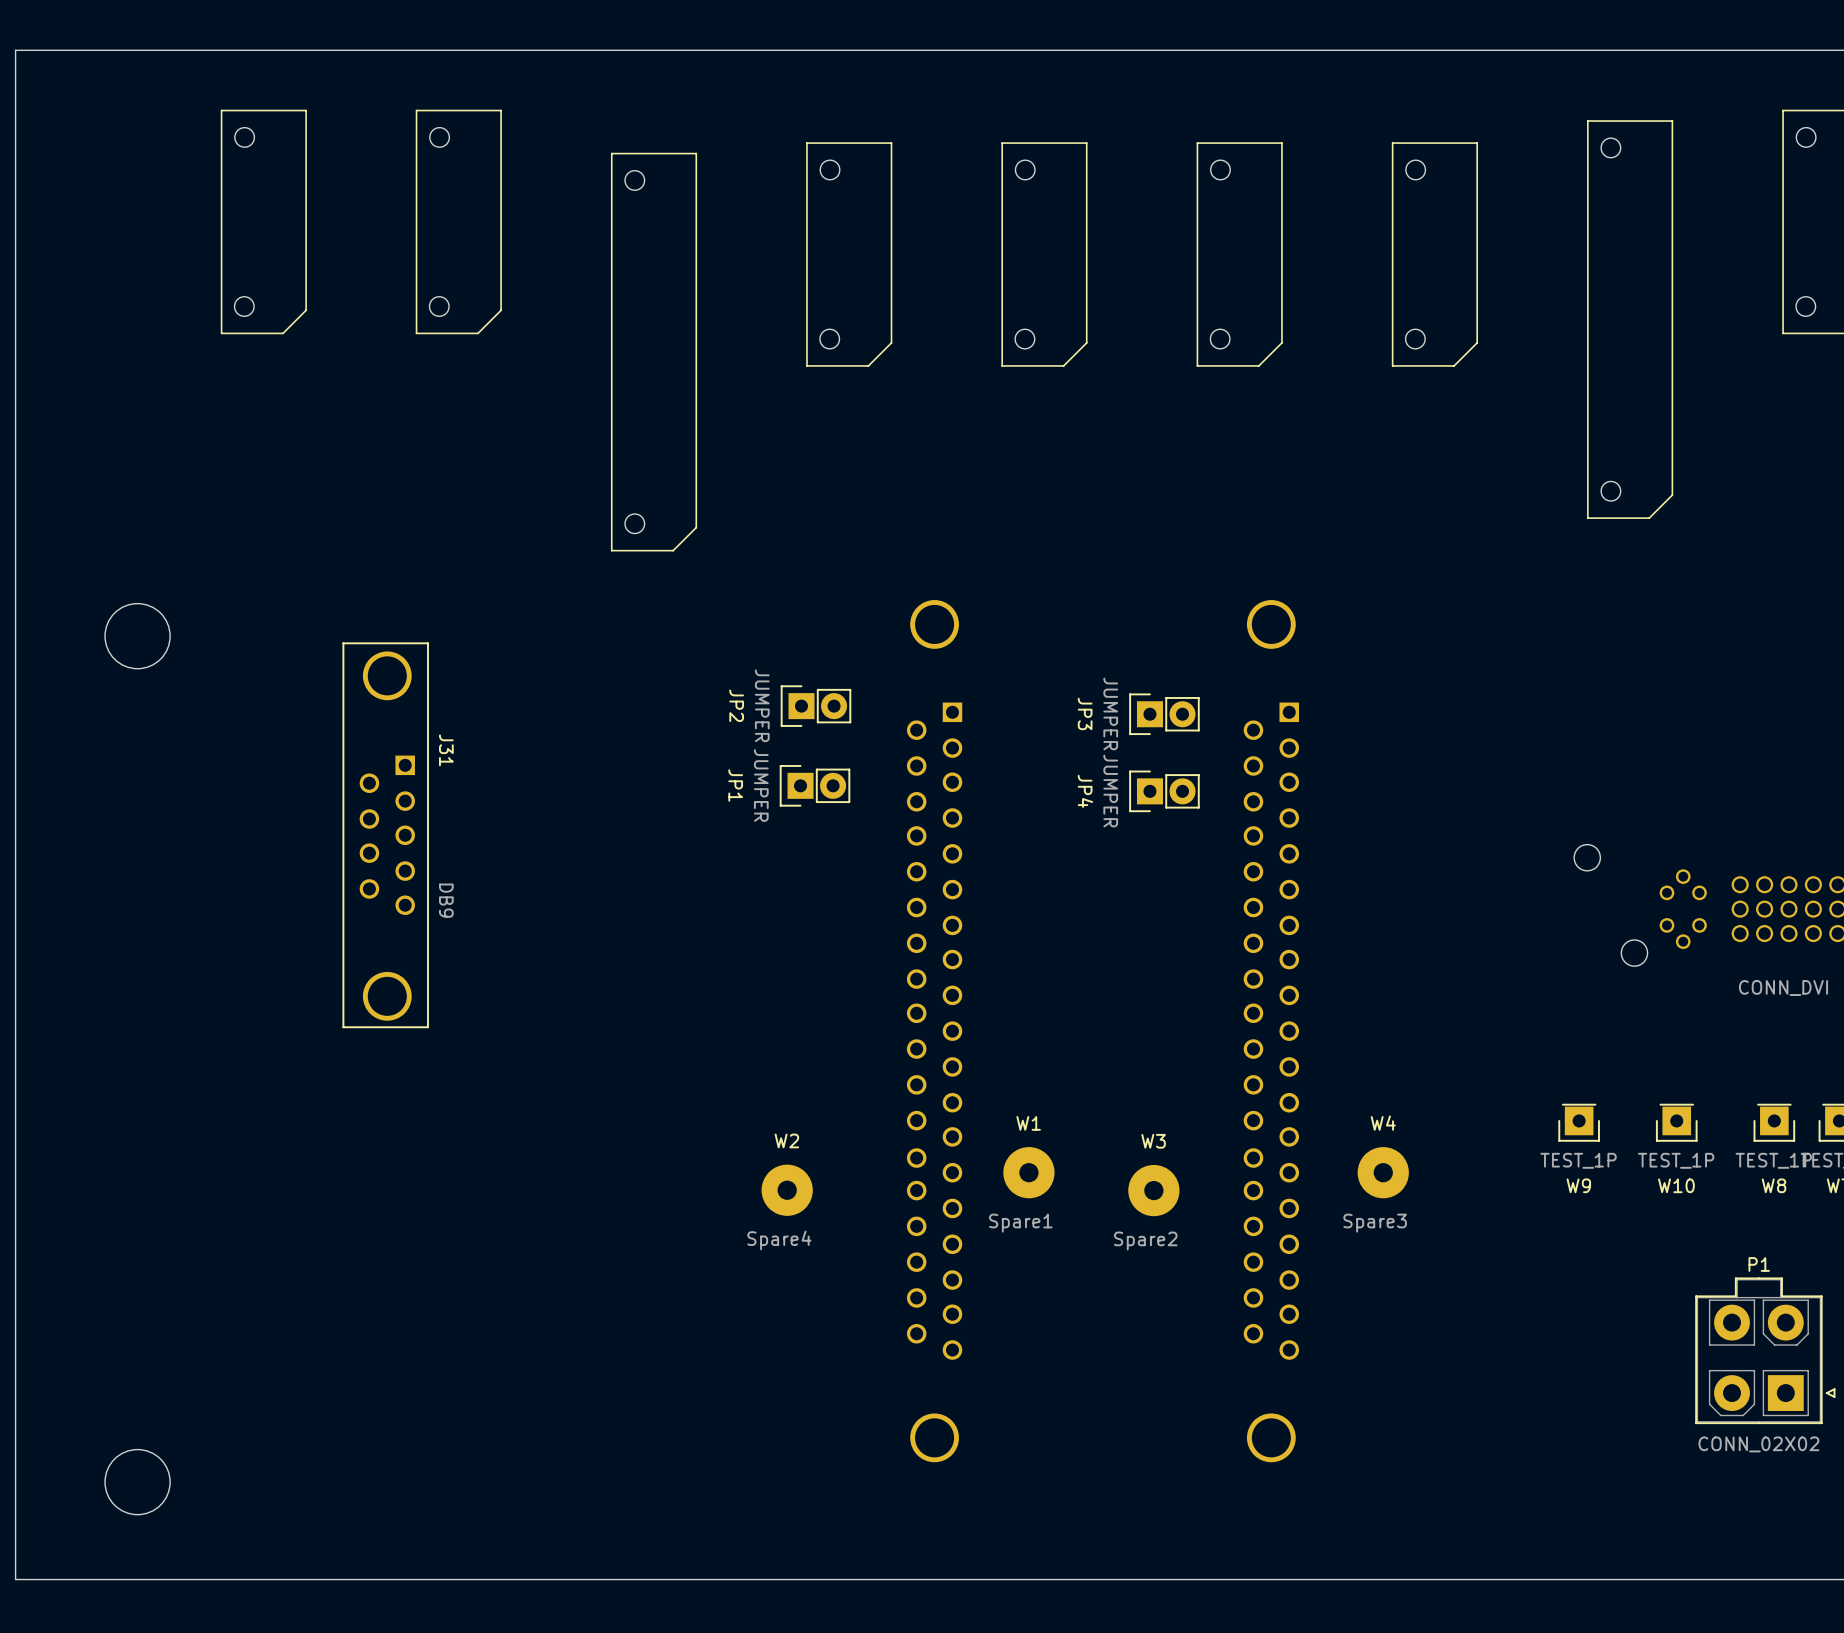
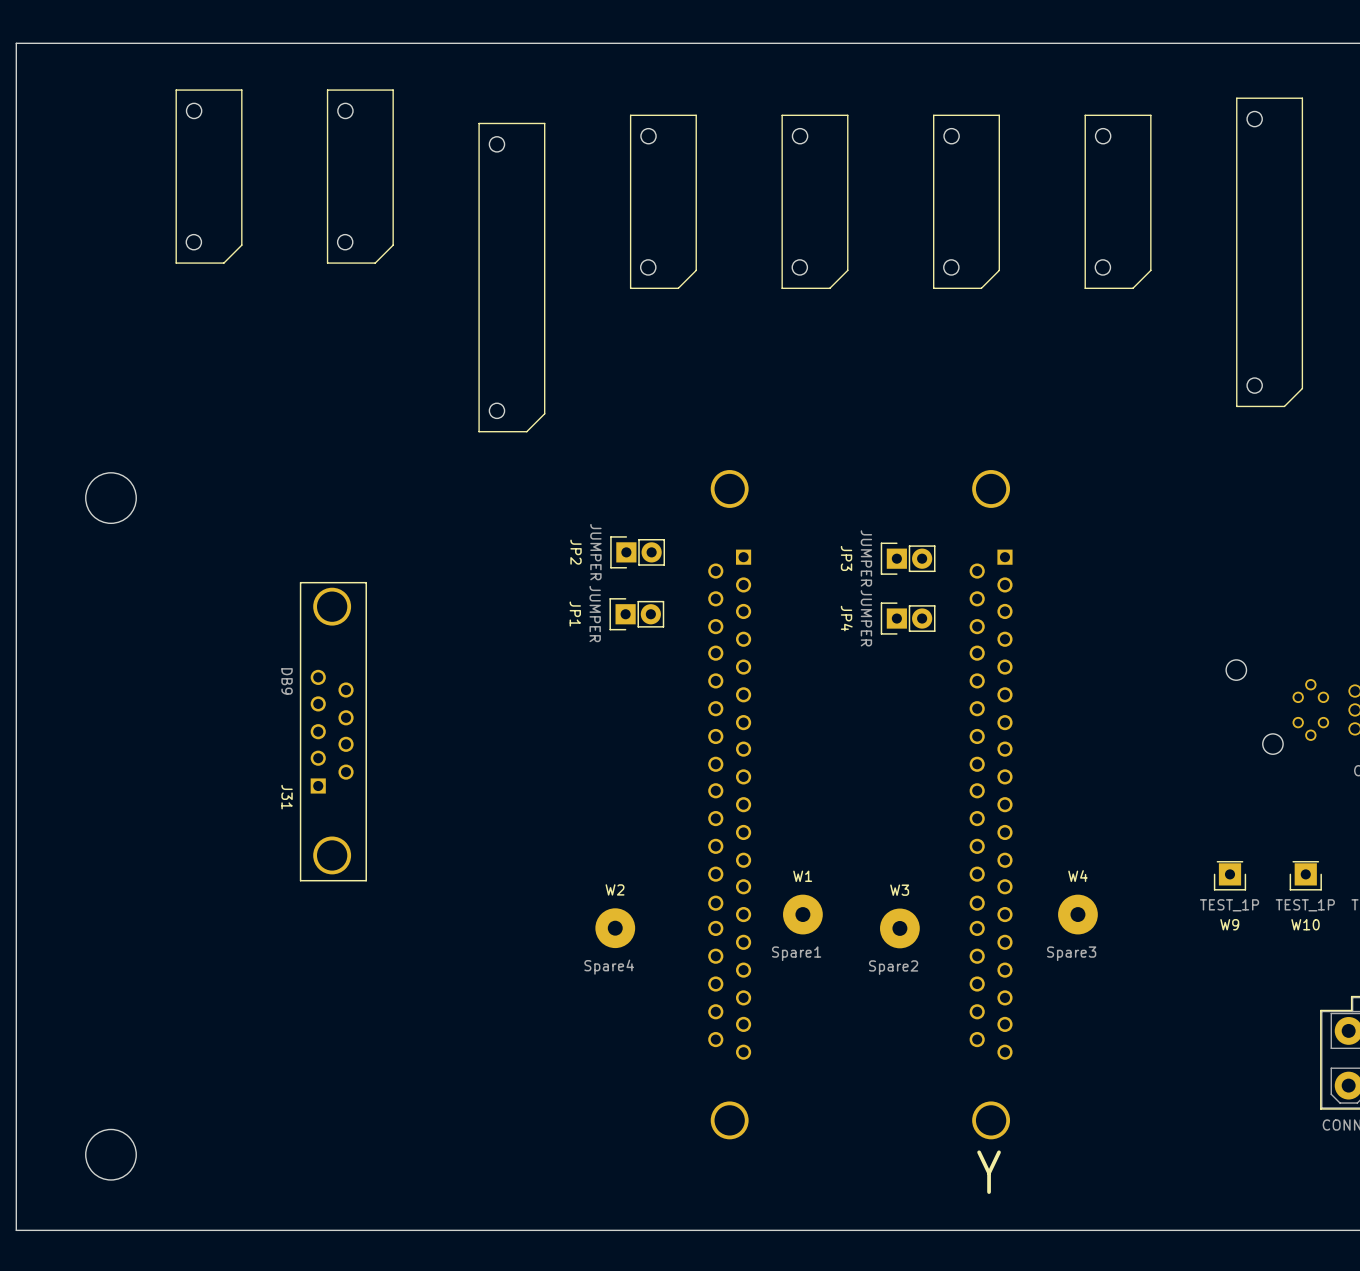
J31 rotation: 0° (385, 835) -> 180° (333, 731)
text: none -> Y (989, 1172)

